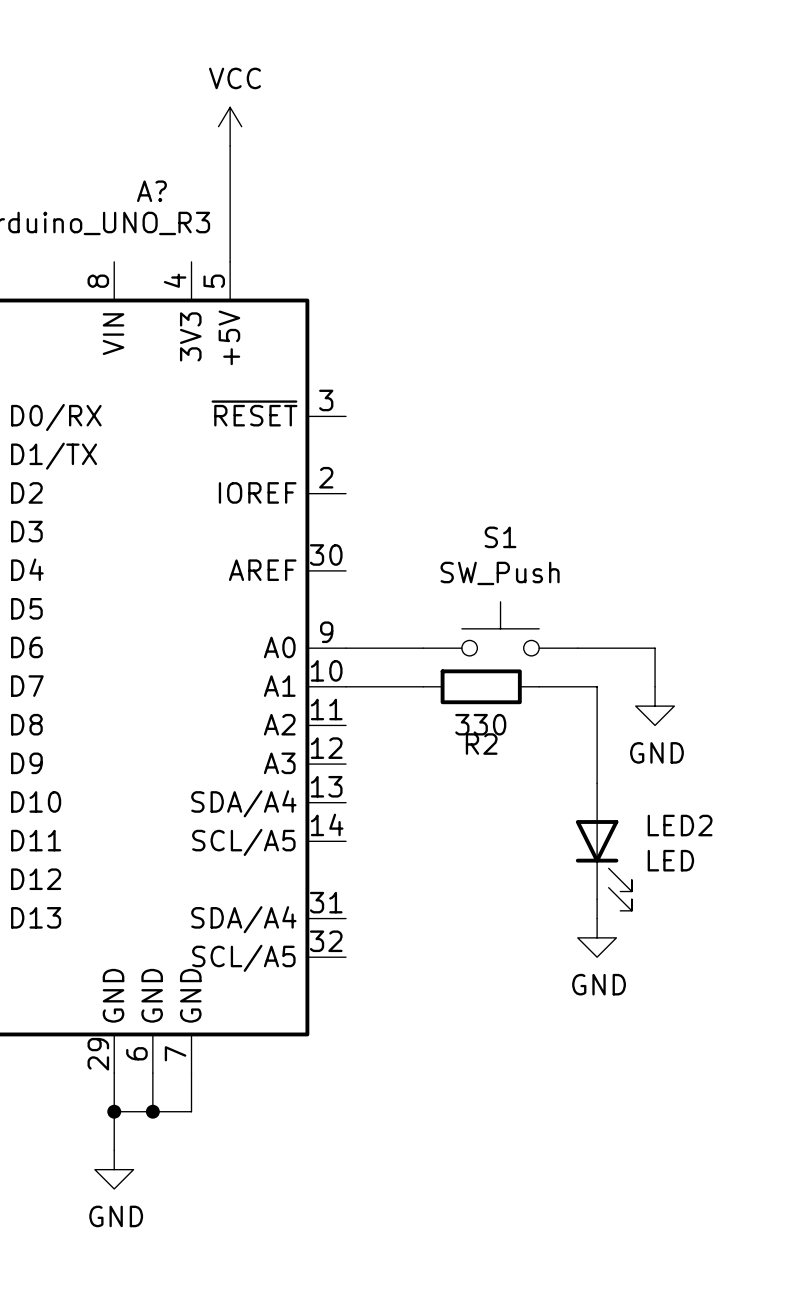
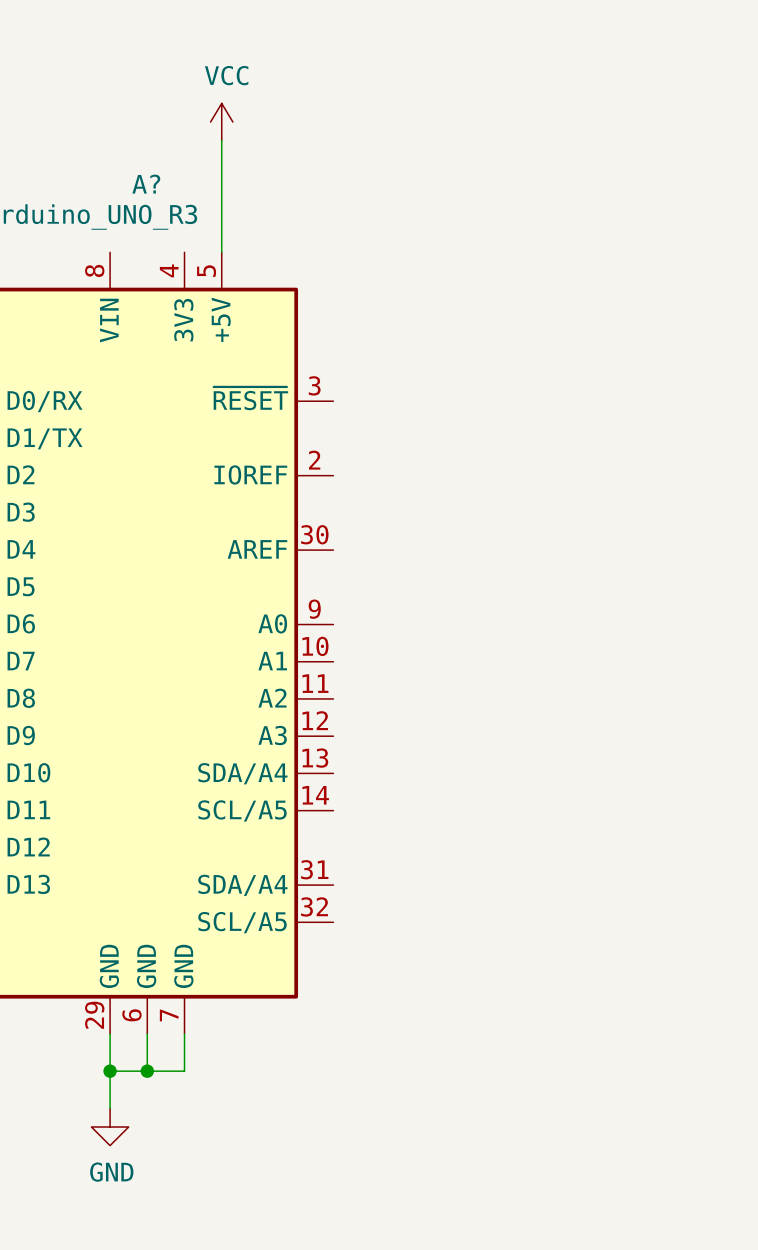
S1: SW_Push (500, 628) -> none
wire: (346, 648) (423, 648) -> none
wire: (577, 648) (655, 648) (655, 686) -> none
wire: (346, 686) (423, 686) -> none
R2: 330 (481, 686) -> none
wire: (539, 686) (597, 686) (597, 783) -> none
power symbol: GND (655, 706) -> none
LED2: LED (603, 847) -> none
wire: (597, 899) (597, 918) -> none
power symbol: GND (597, 937) -> none

